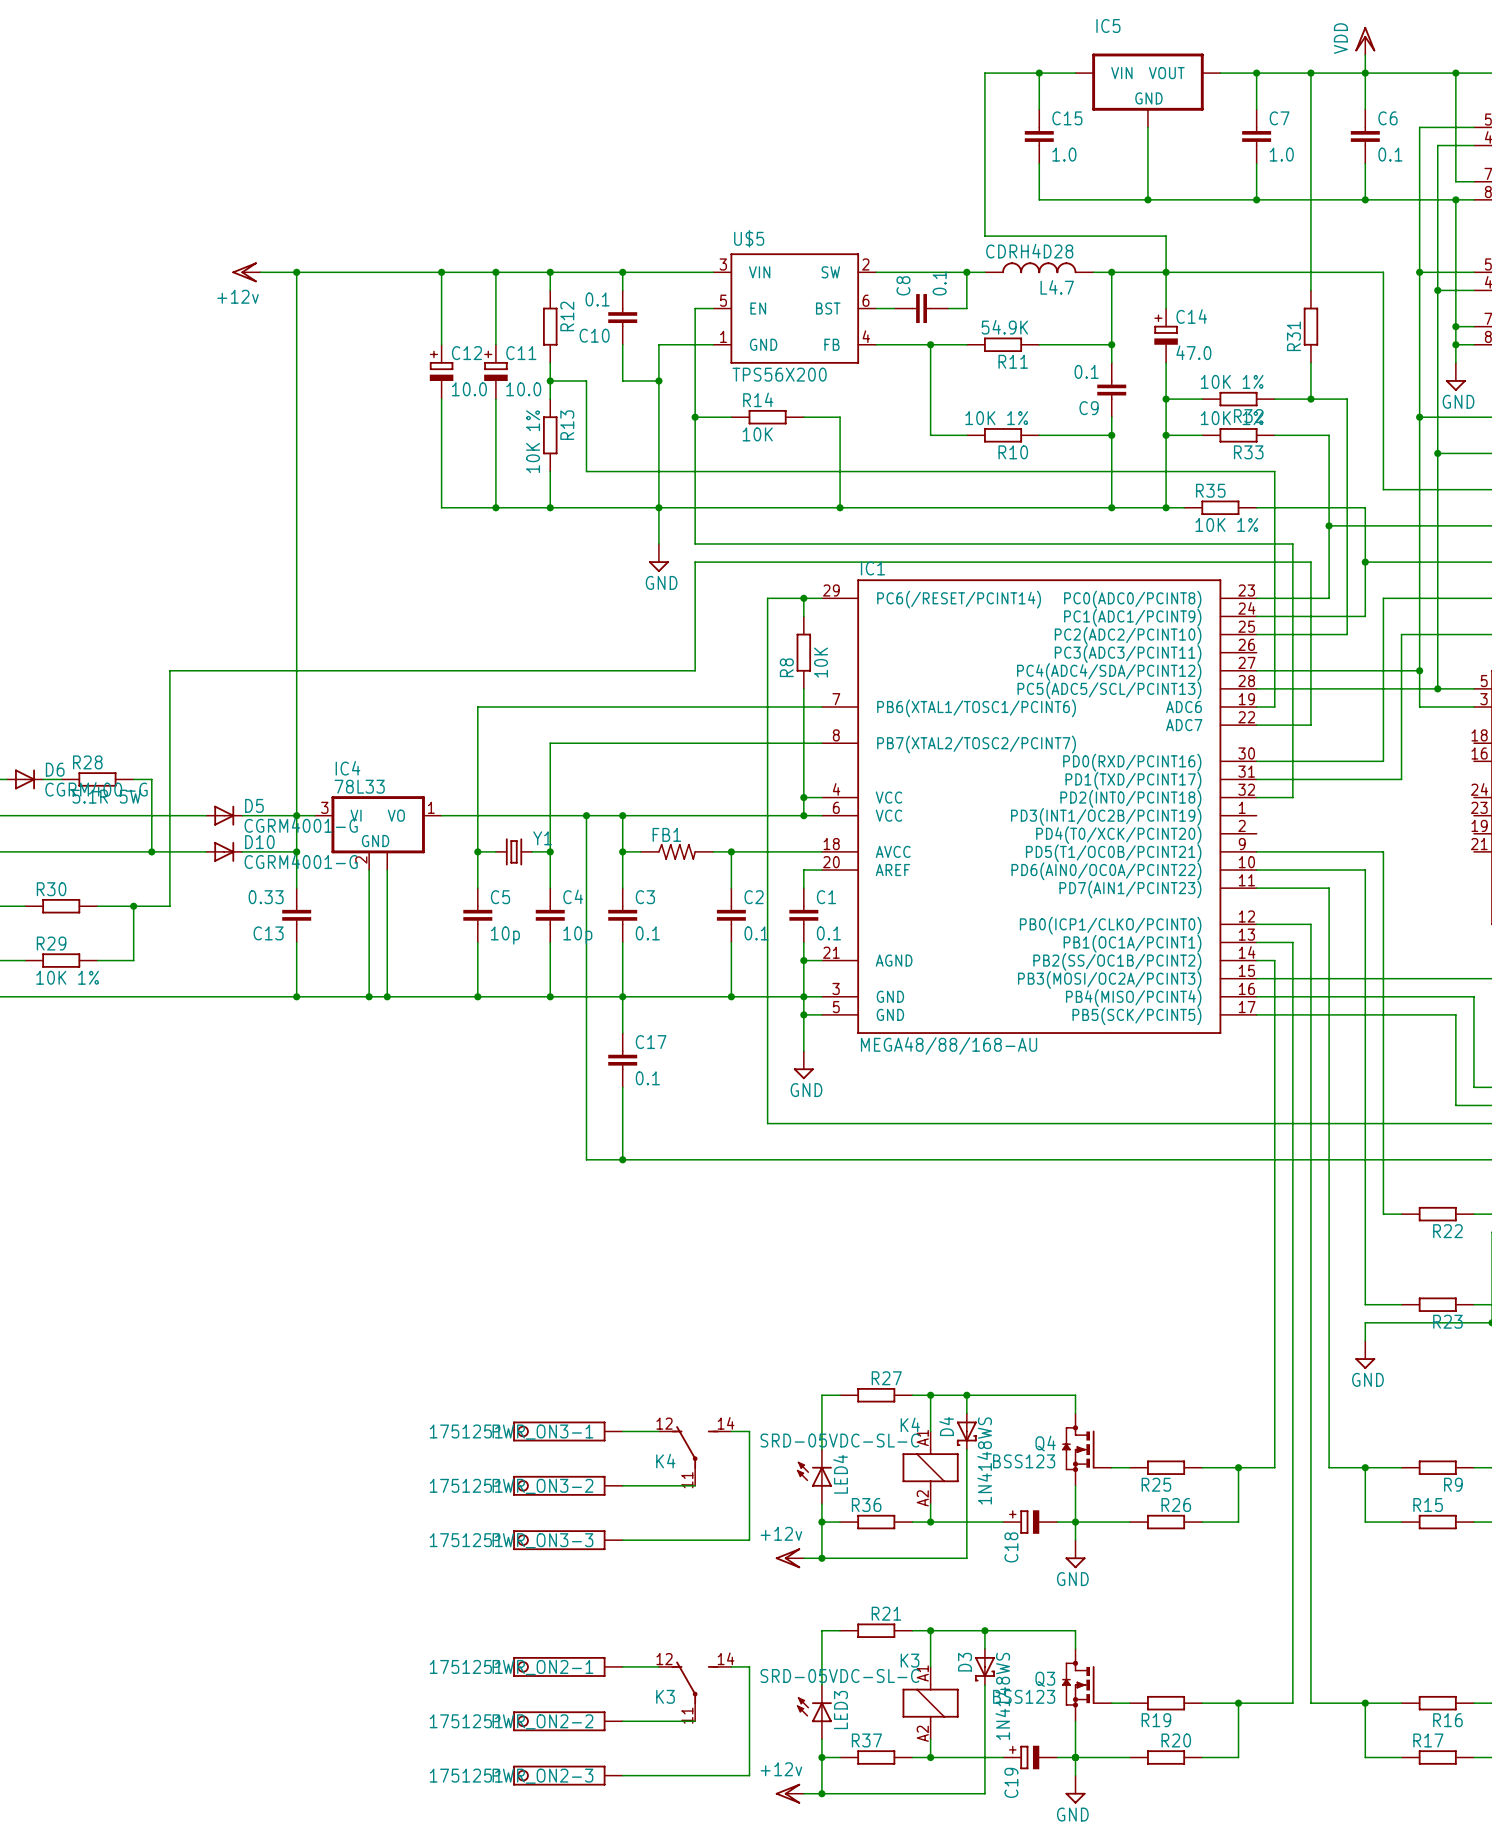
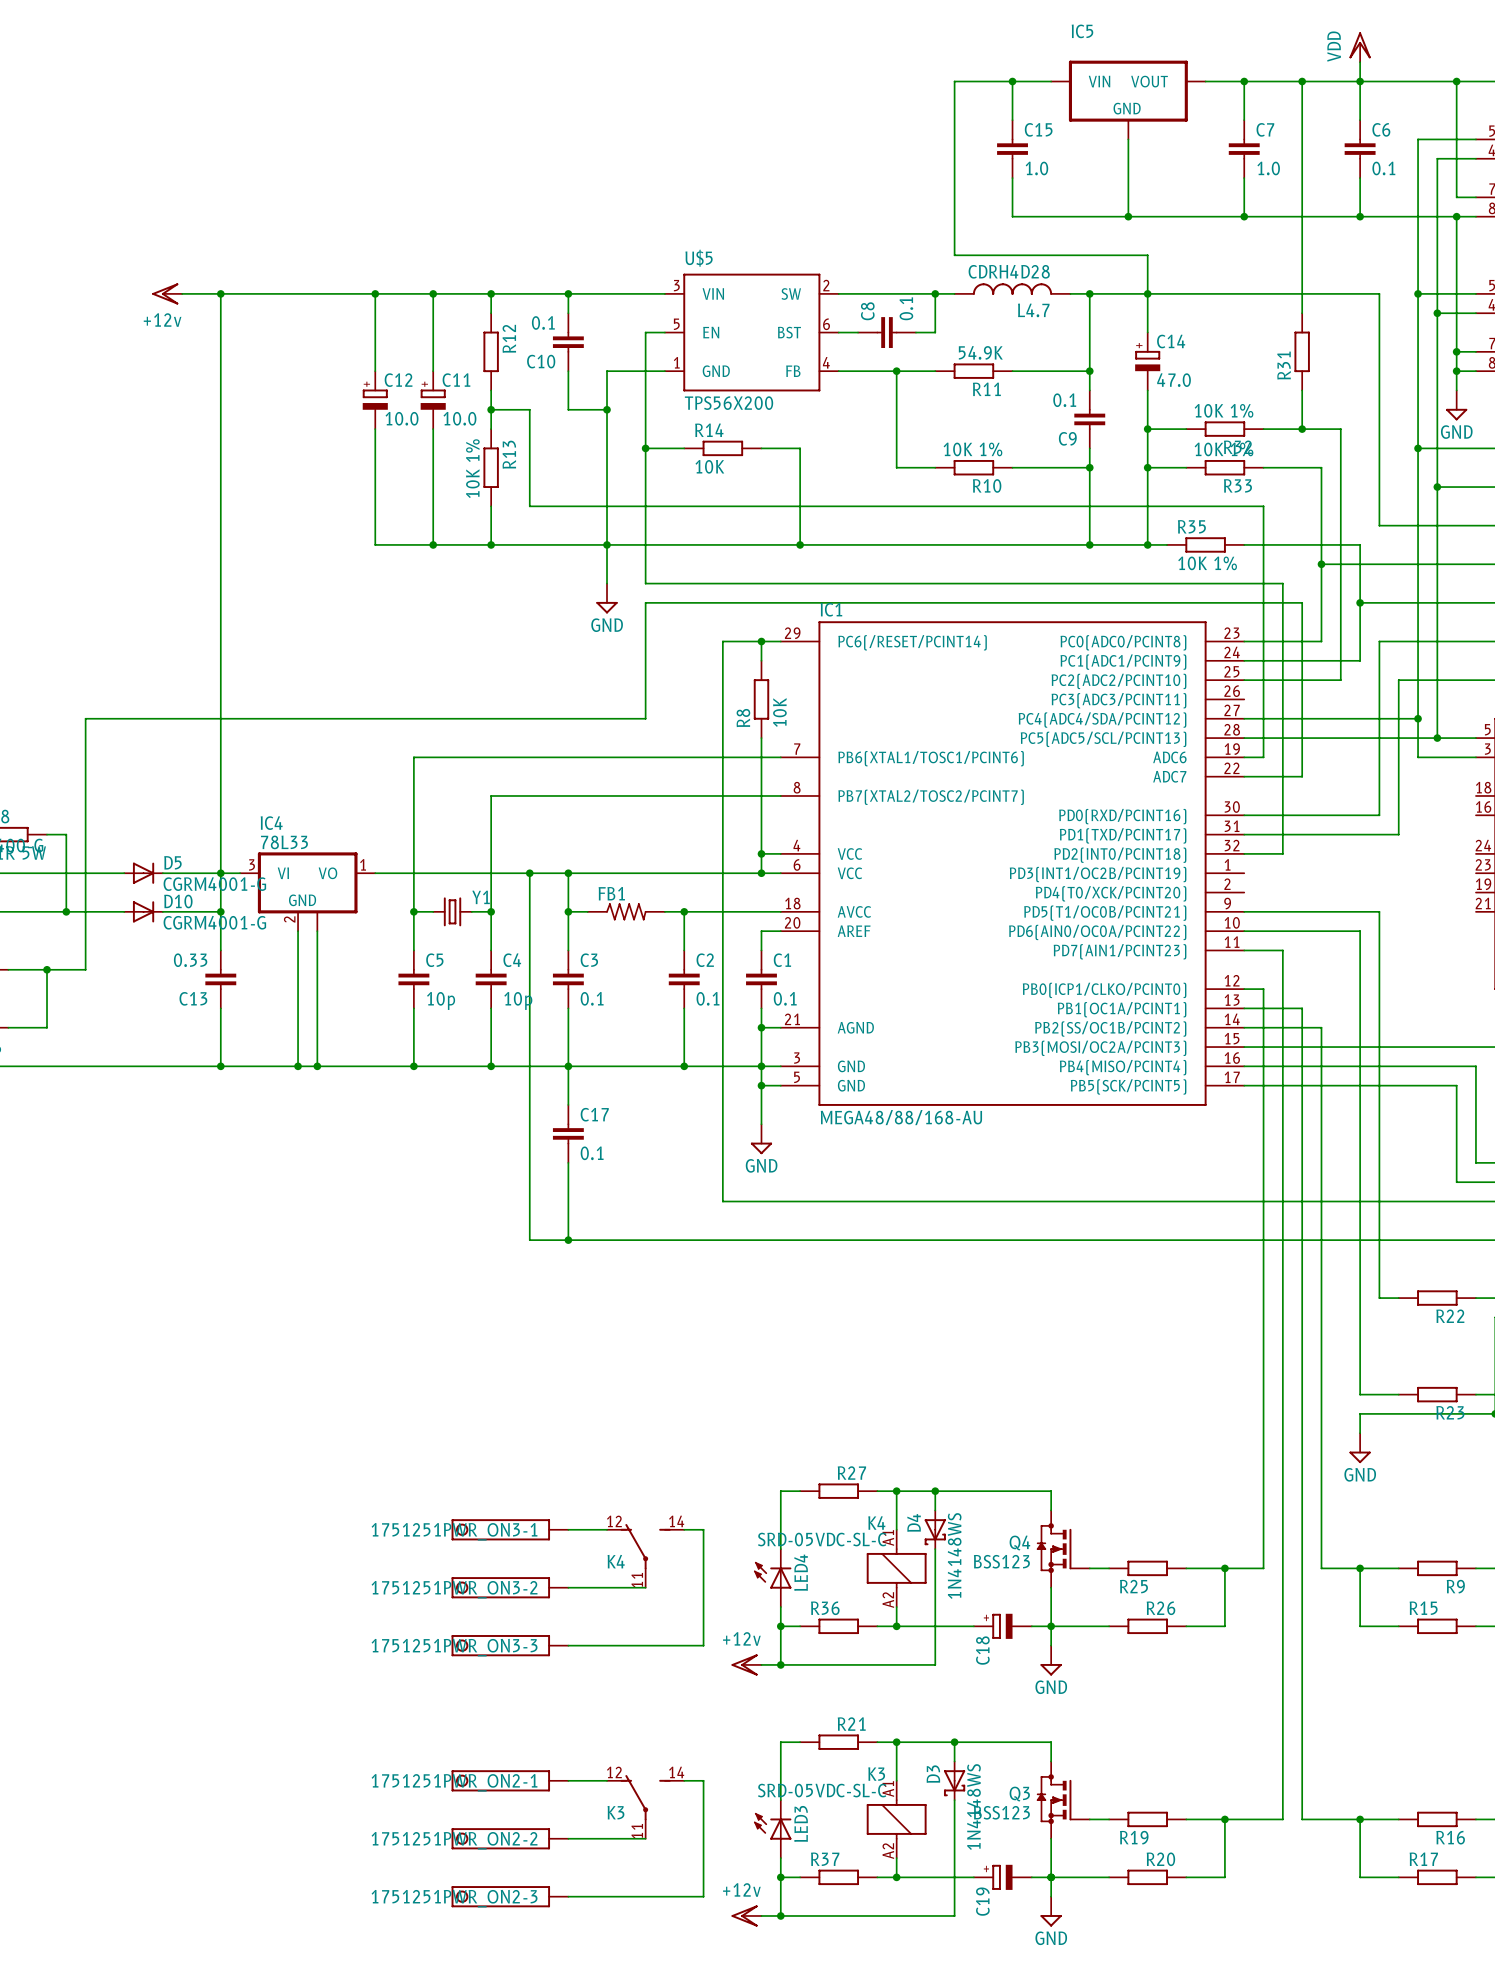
wire: (1292, 888) (1329, 888) (1329, 960) -> (1282, 950) (1282, 1008) (1302, 1008)
wire: (1274, 924) (1310, 924) (1310, 942) -> (1263, 989) (1263, 1027) (1321, 1027)

